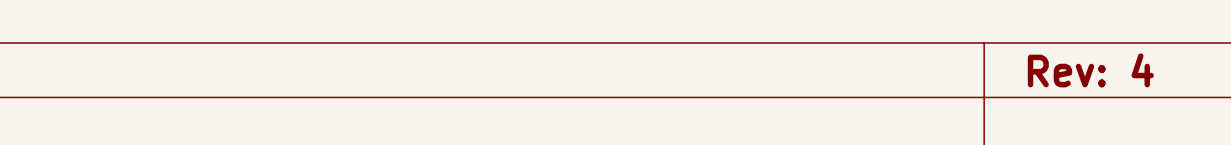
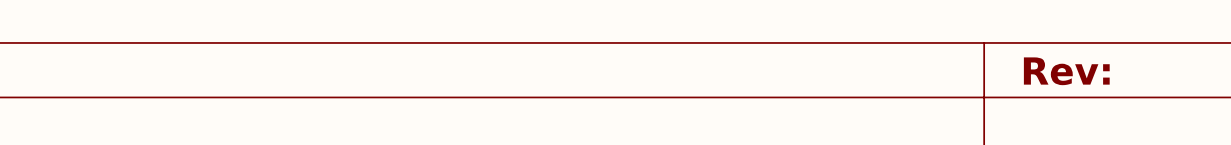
title block: Rev: 4 (1090, 70) -> Rev: (1066, 71)

